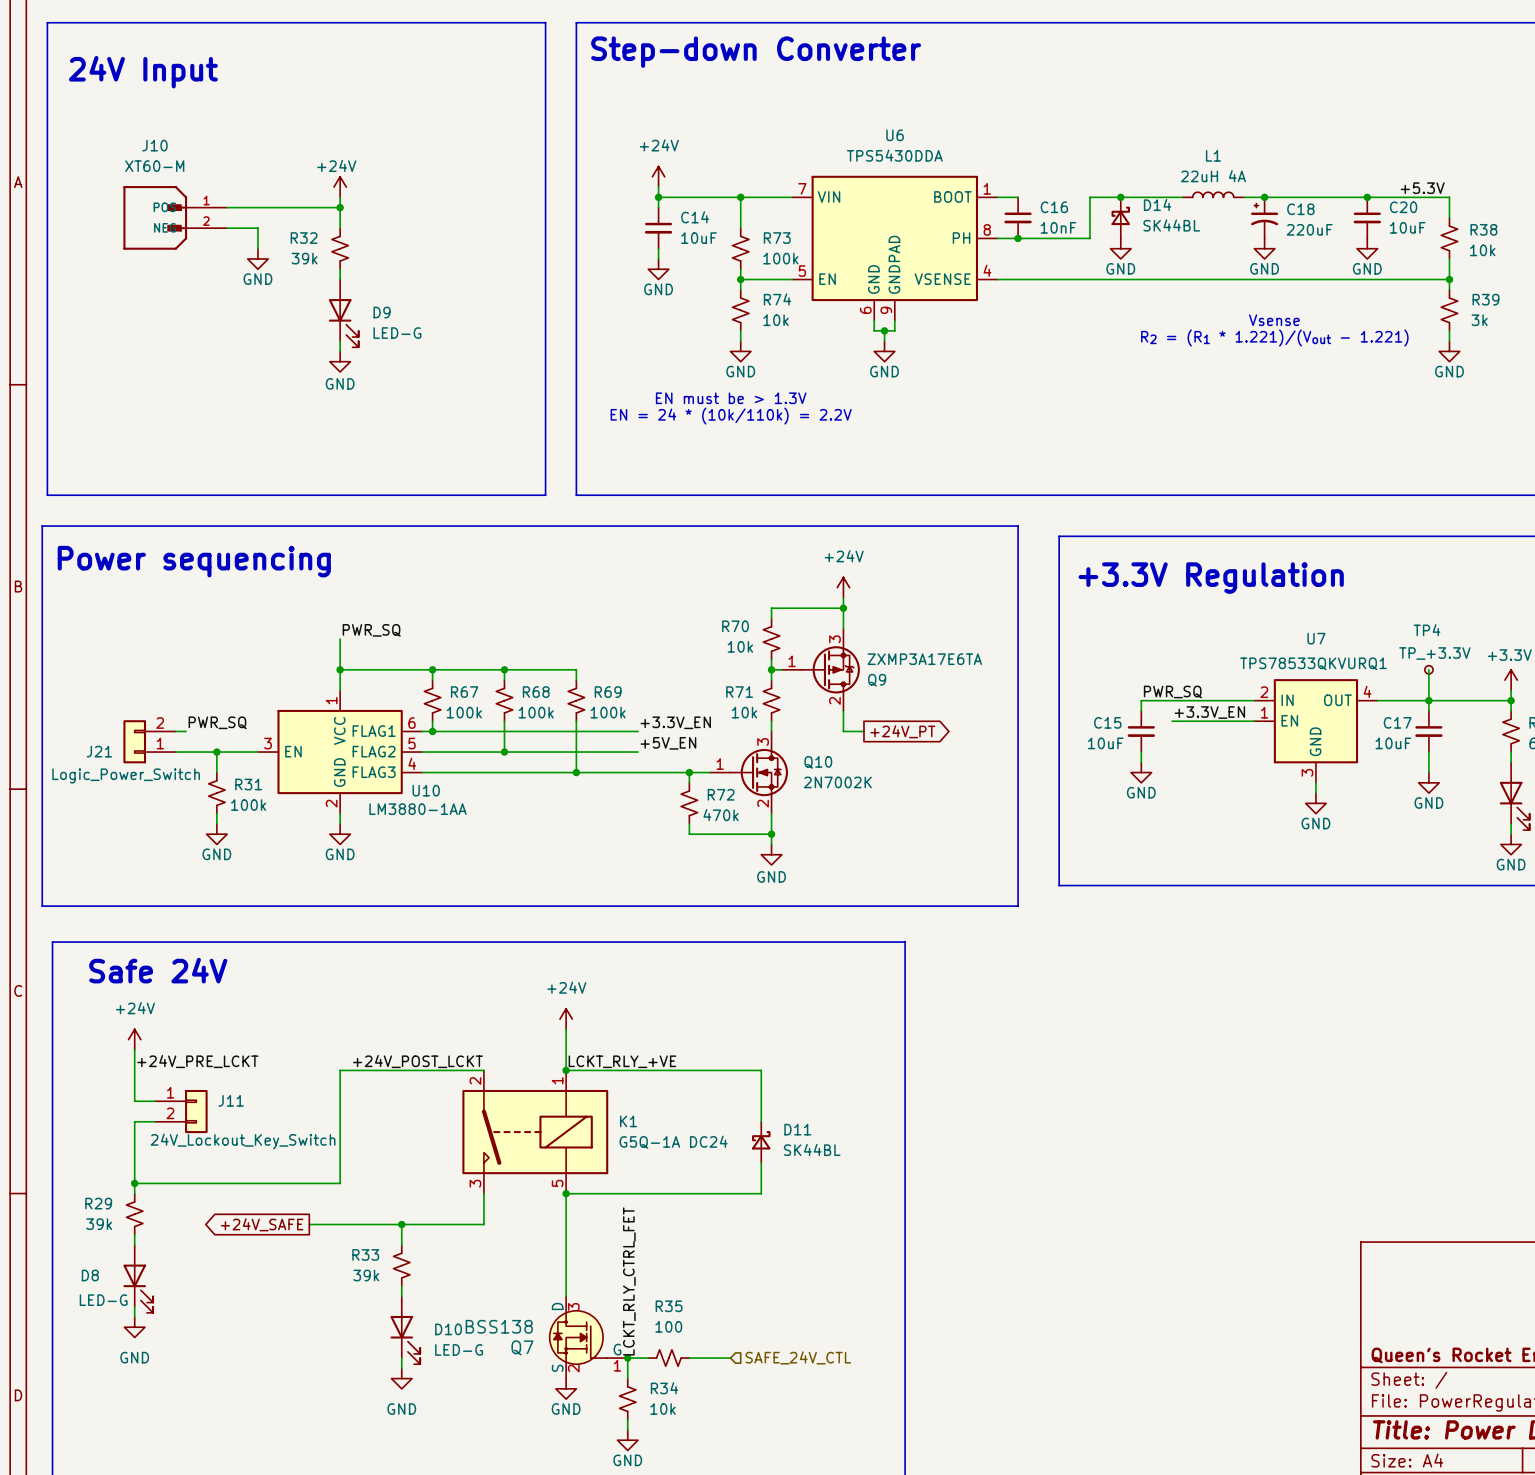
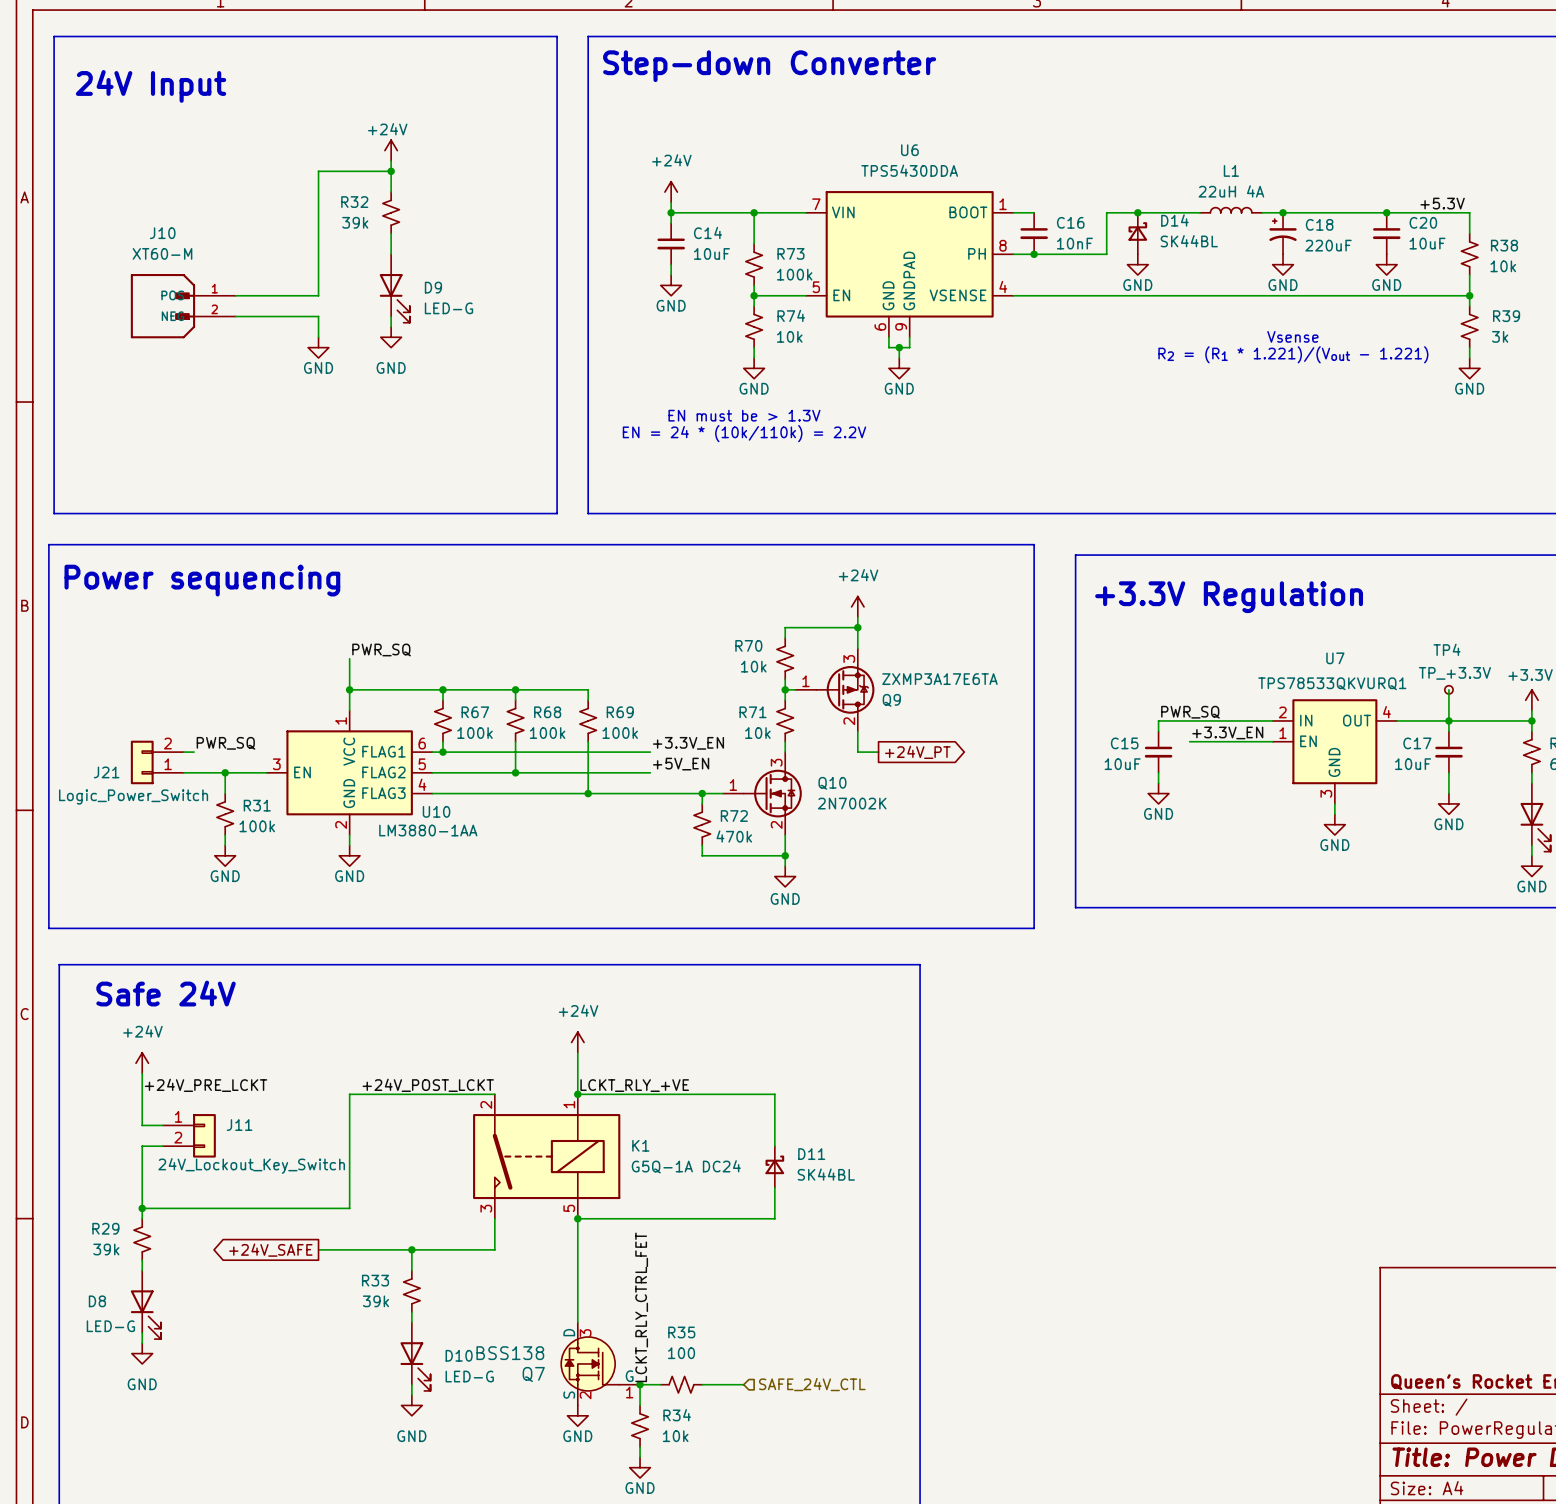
wire: none -> (391, 171) (318, 171) (318, 295) (235, 295)
junction: none -> (391, 171)
power symbol position: +24V (340, 187) -> +24V (391, 150)
wire: (340, 197) (340, 228) -> (391, 160) (391, 192)
wire: (227, 207) (340, 207) -> none
junction: (340, 207) -> none
J10 position: (175, 217) -> (183, 306)
wire: none -> (391, 233) (391, 254)
wire: (227, 228) (257, 228) (257, 248) -> none
R32 position: (340, 248) -> (391, 212)
power symbol: GND (257, 258) -> none
wire: (340, 269) (340, 279) -> (391, 316) (391, 326)
wire: none -> (235, 316) (318, 316) (318, 337)
D9 position: (343, 313) -> (394, 288)
power symbol: none -> GND (391, 337)
power symbol: none -> GND (318, 347)
wire: (340, 341) (340, 351) -> none
power symbol: GND (340, 361) -> none

